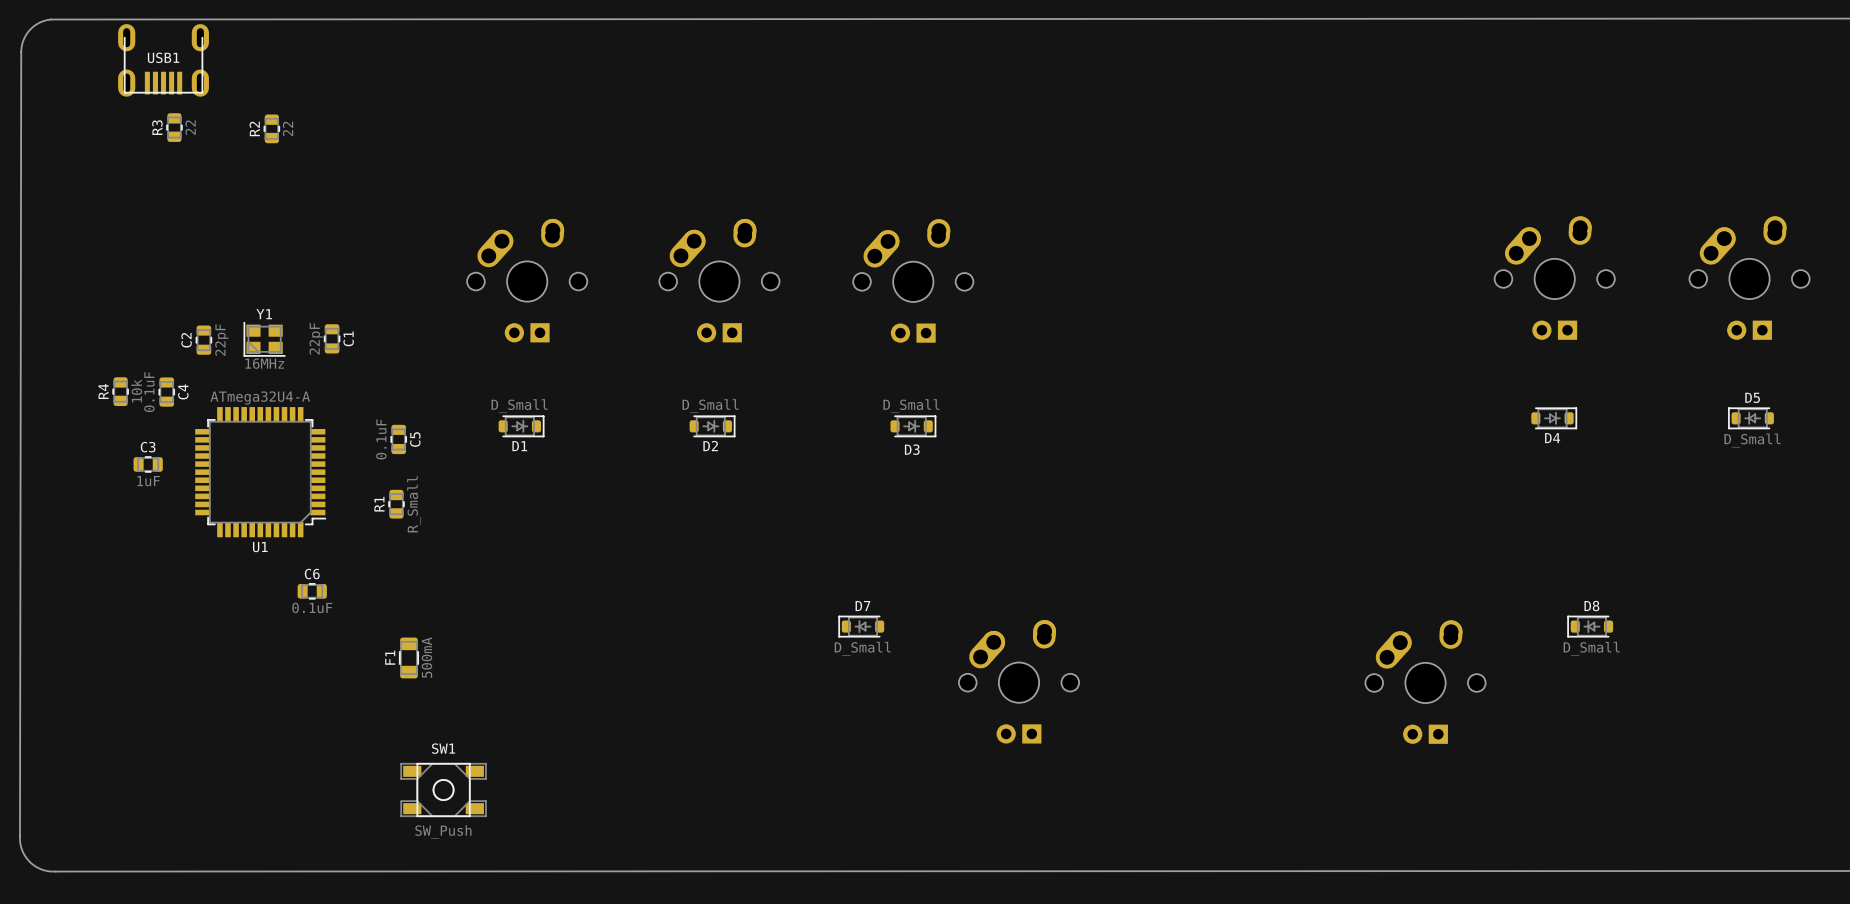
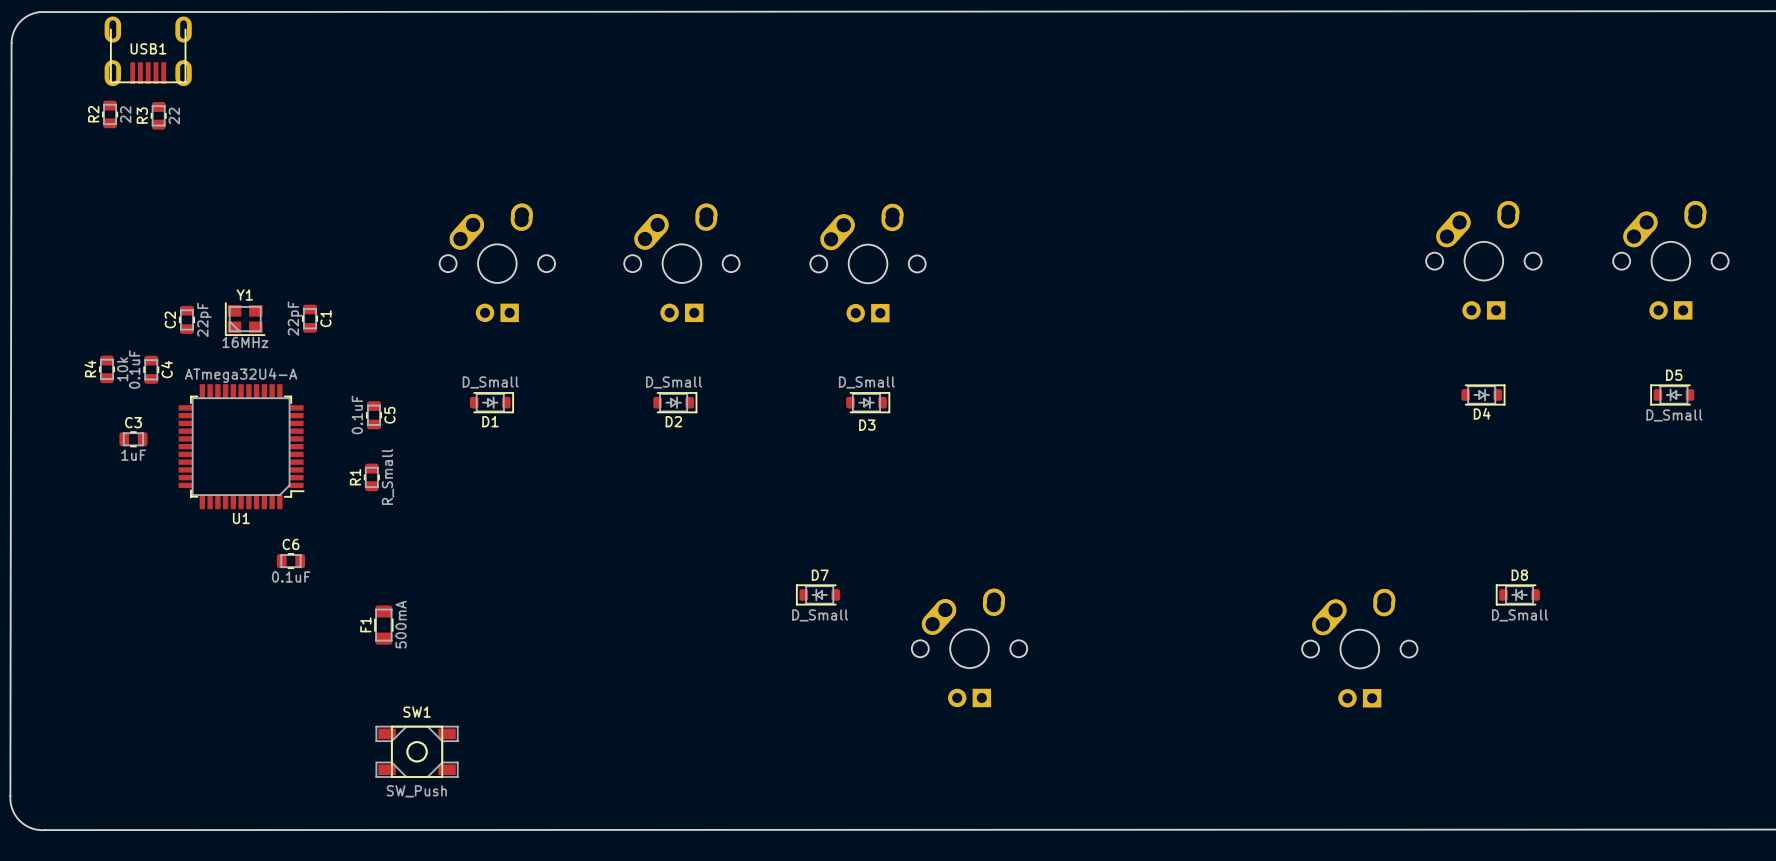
R2 position: (271, 128) -> (110, 114)

